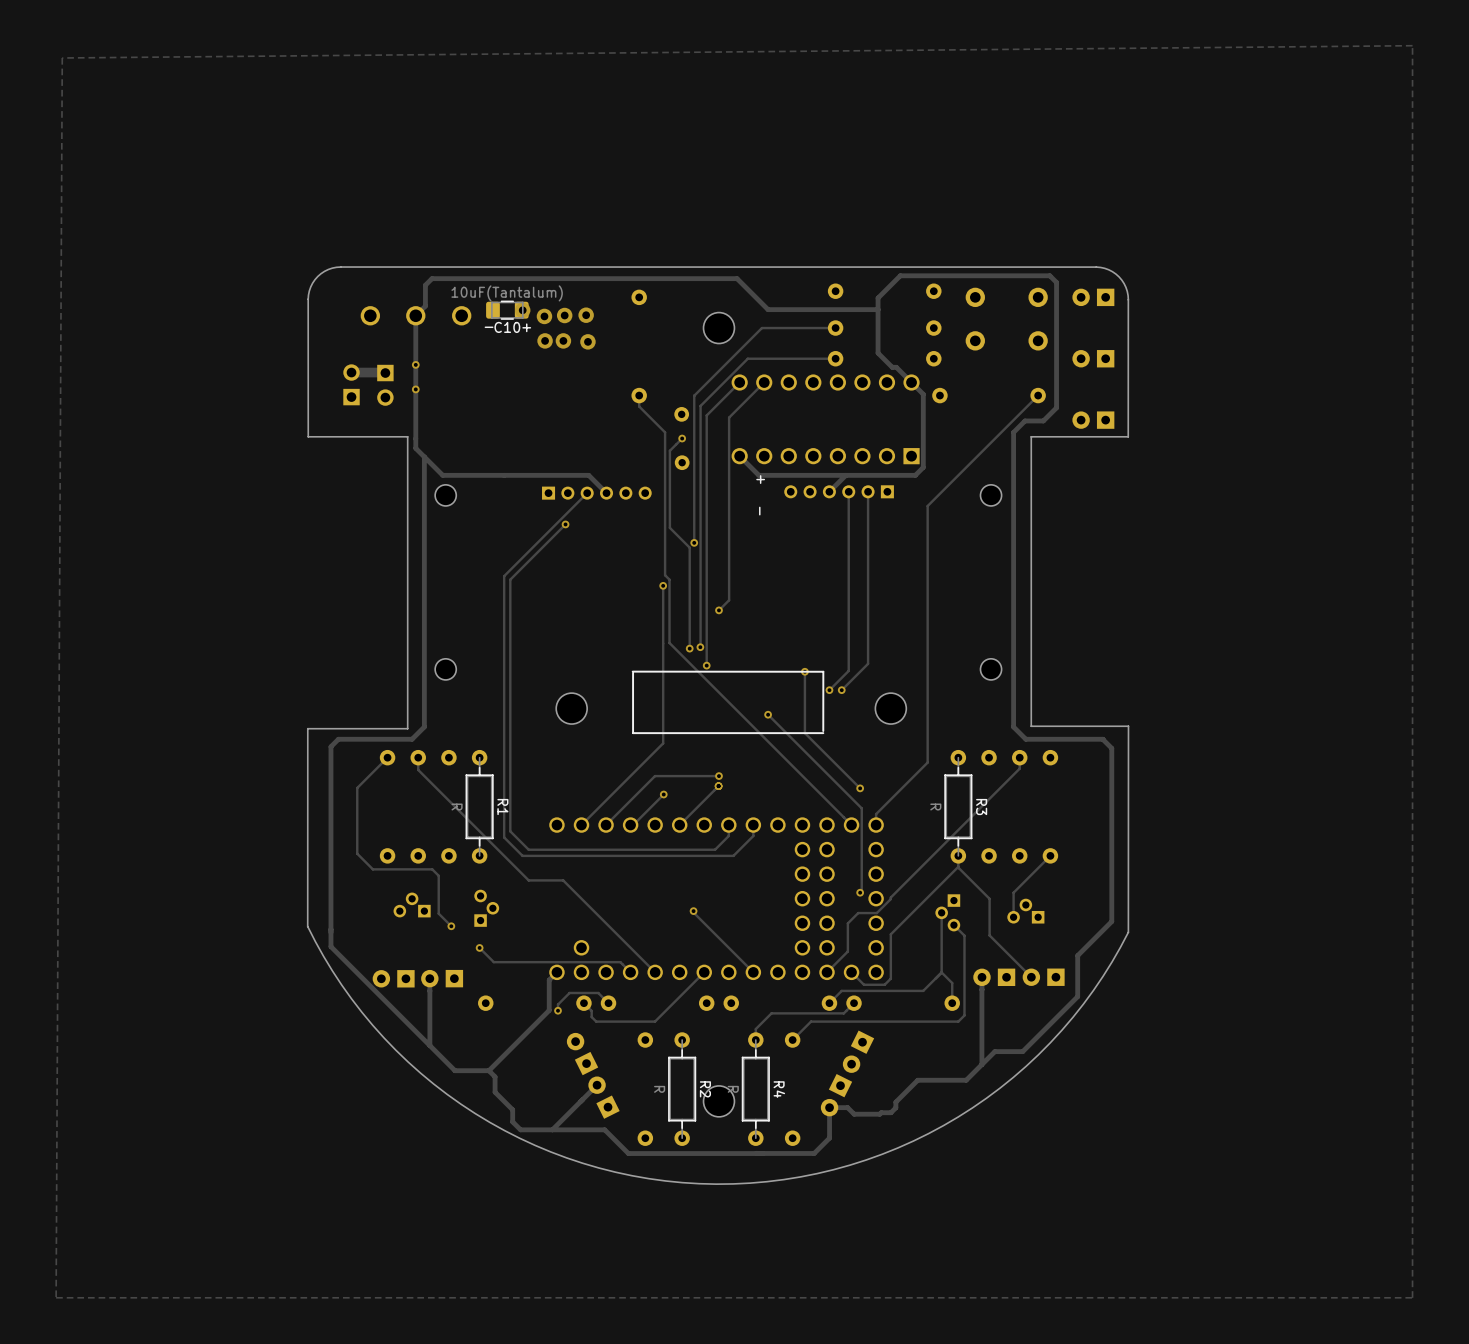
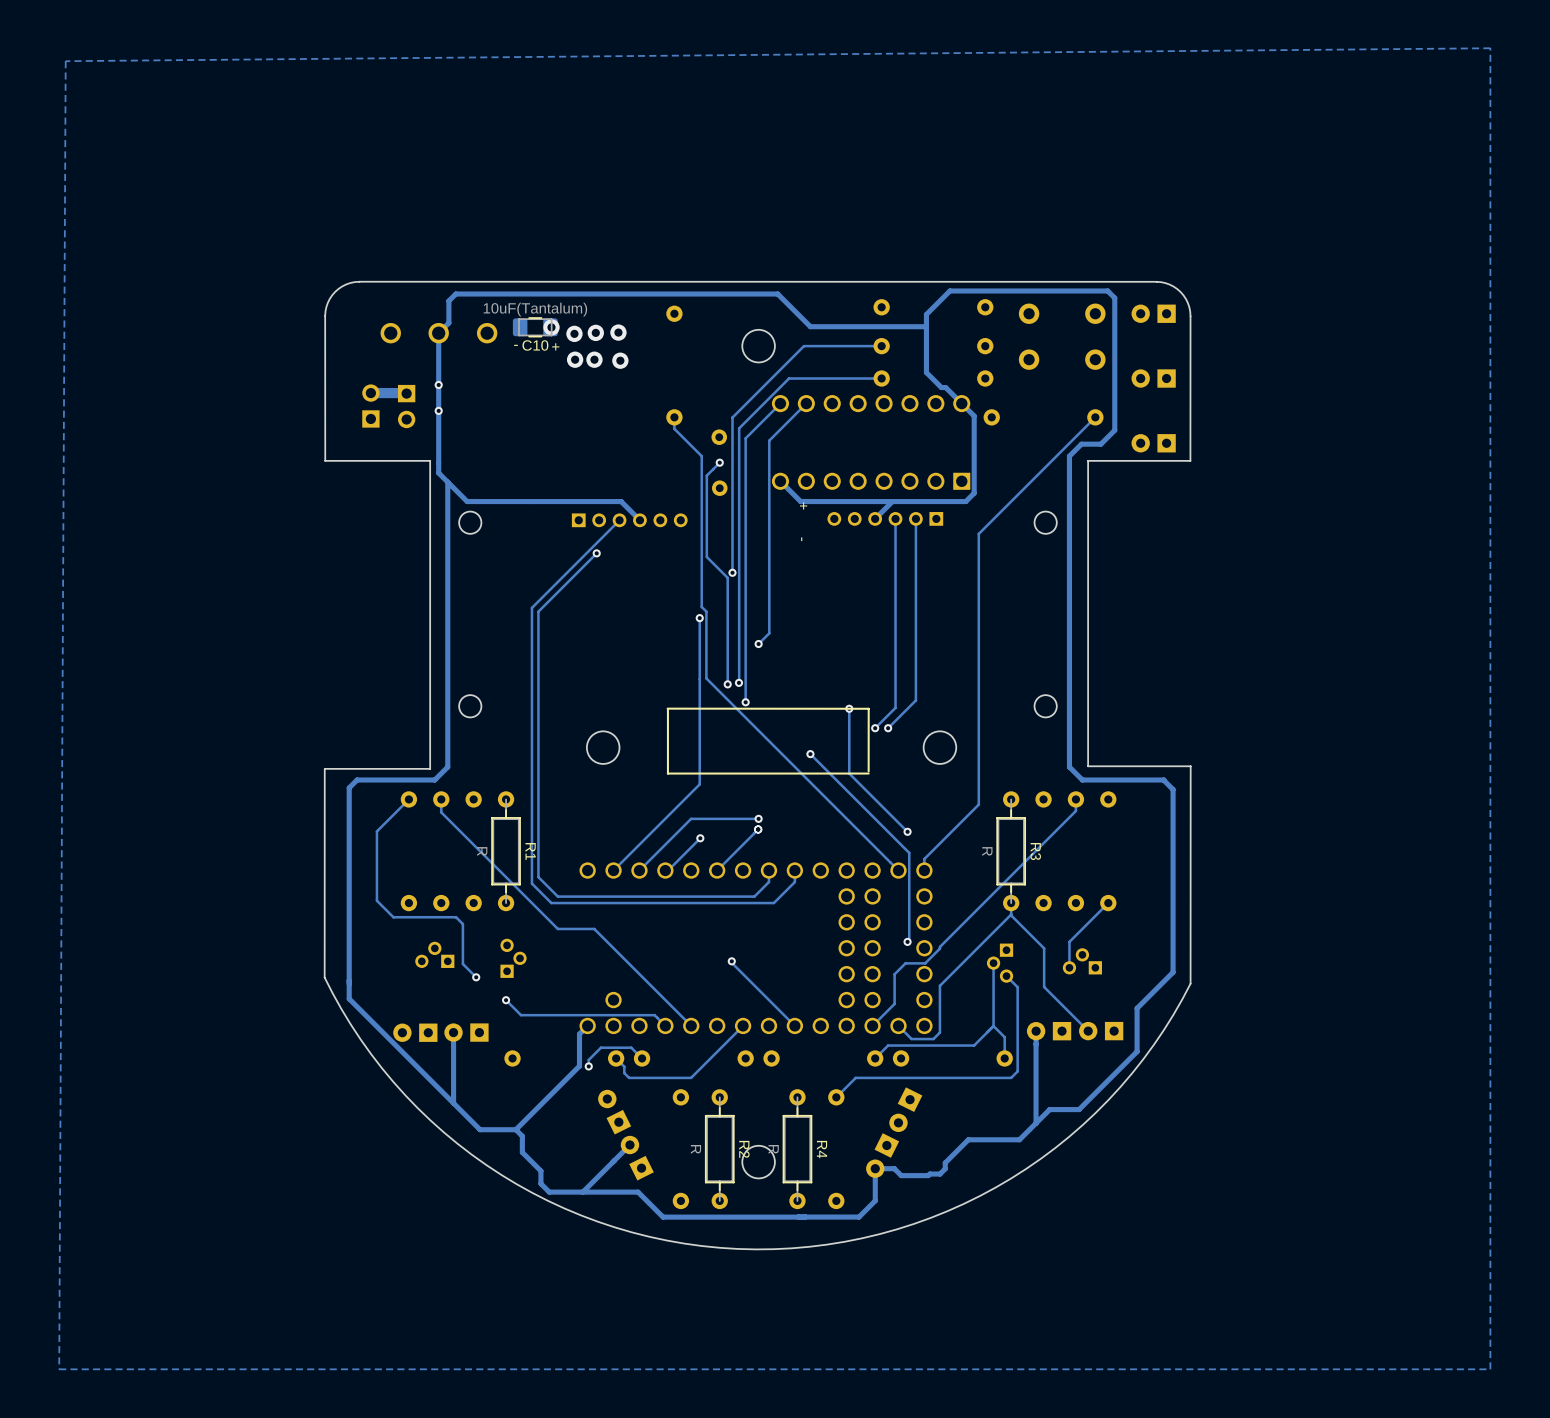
track: (854, 1003) (843, 1013) (771, 1013) (755, 1029) (755, 1040) -> none

